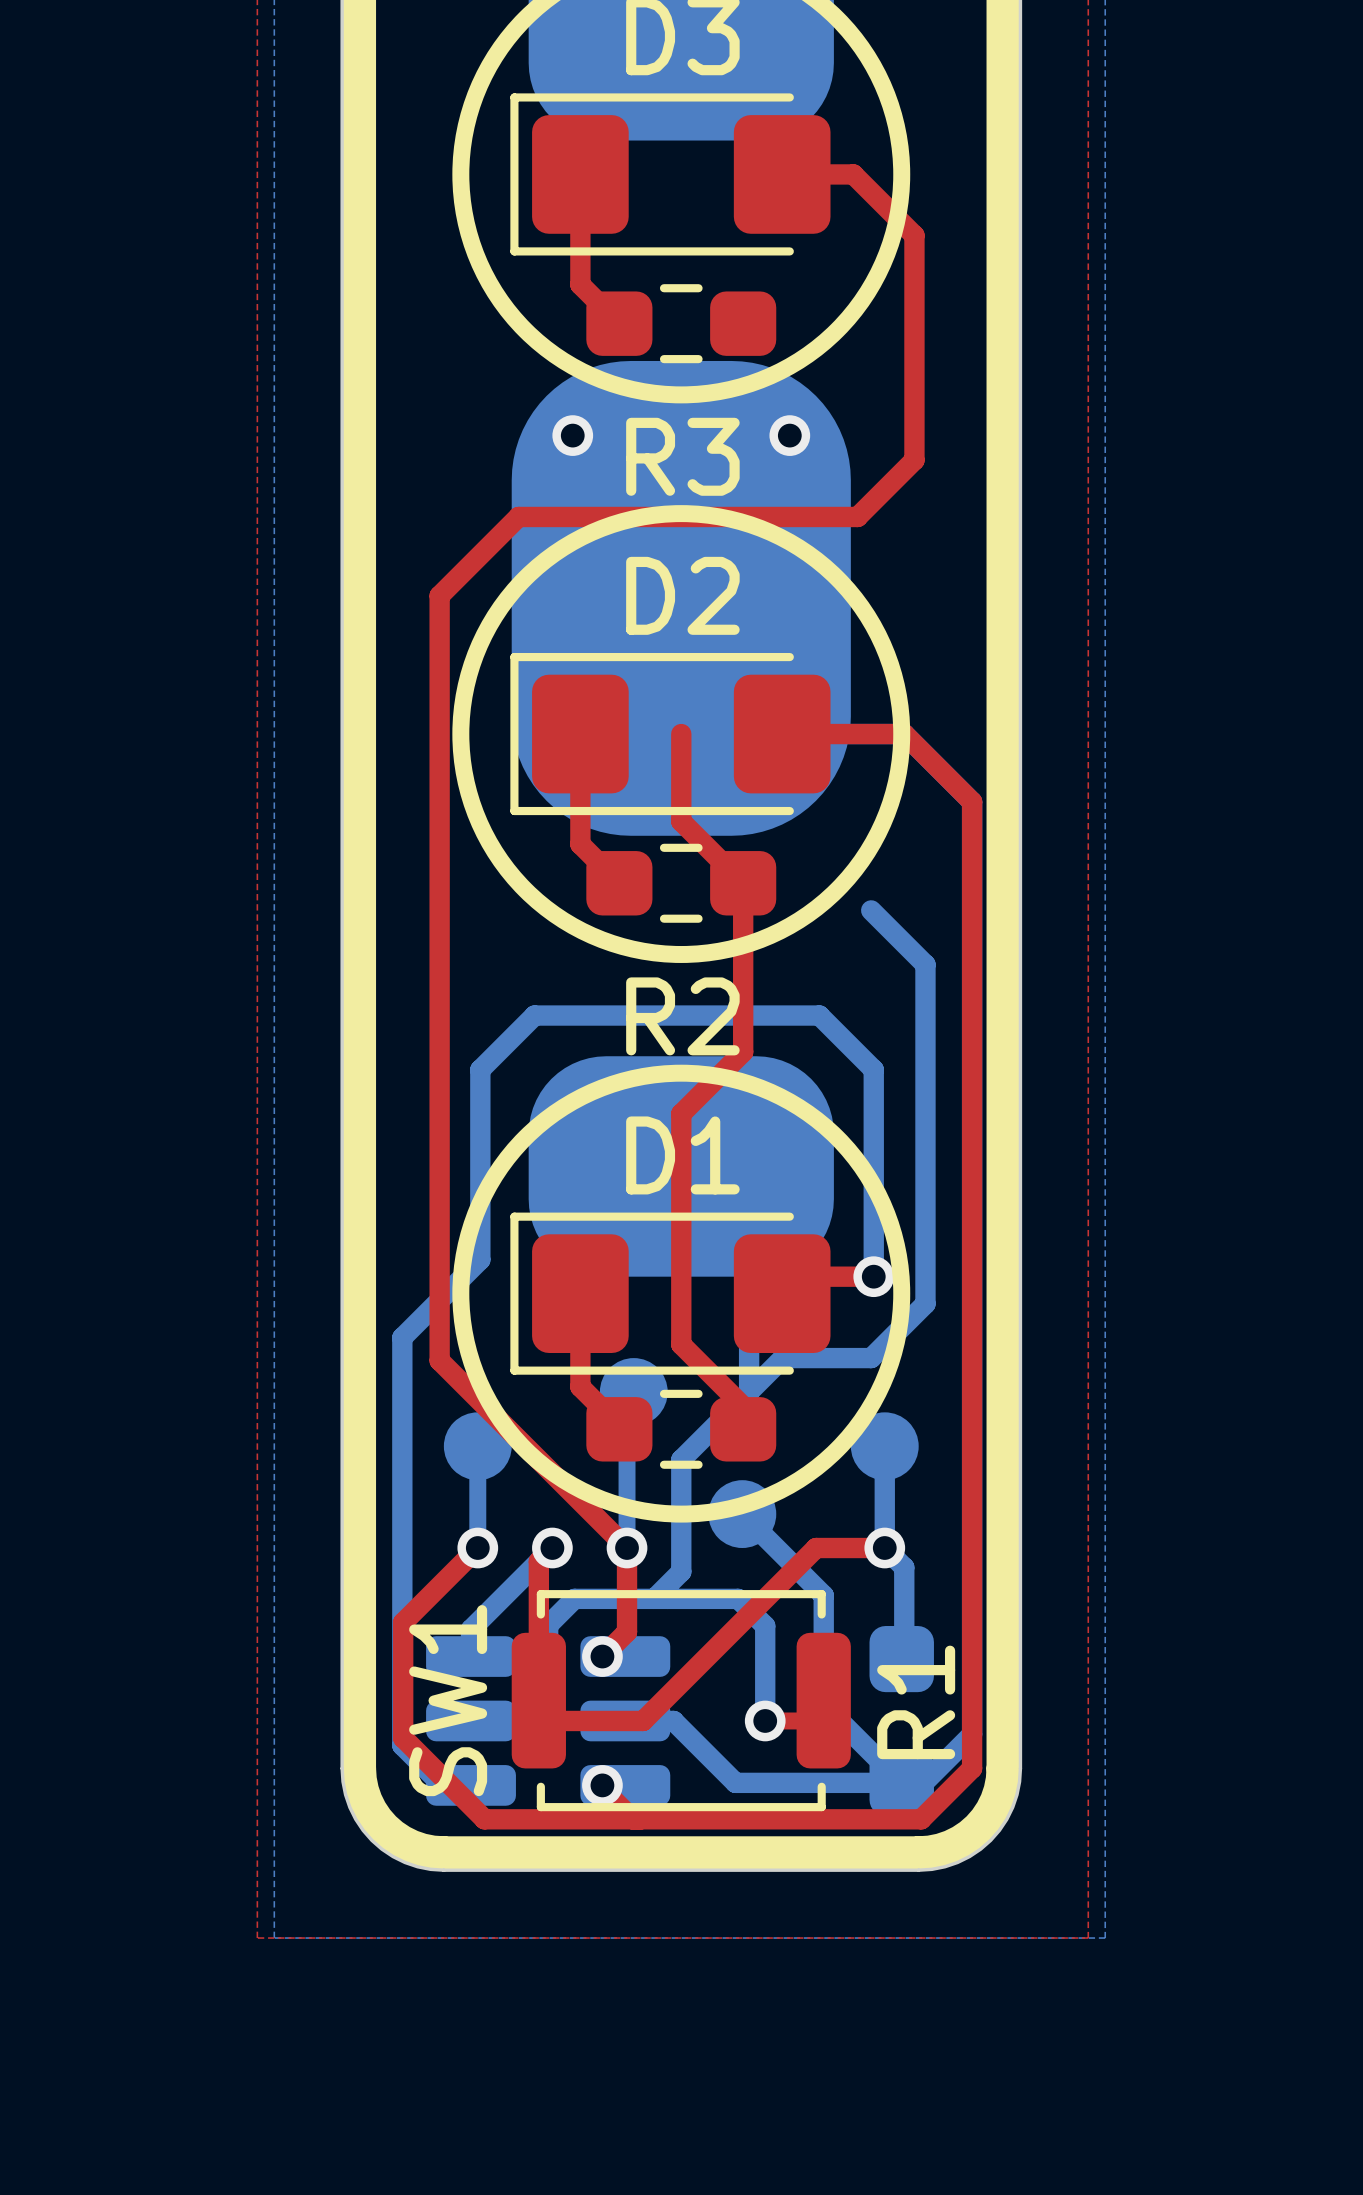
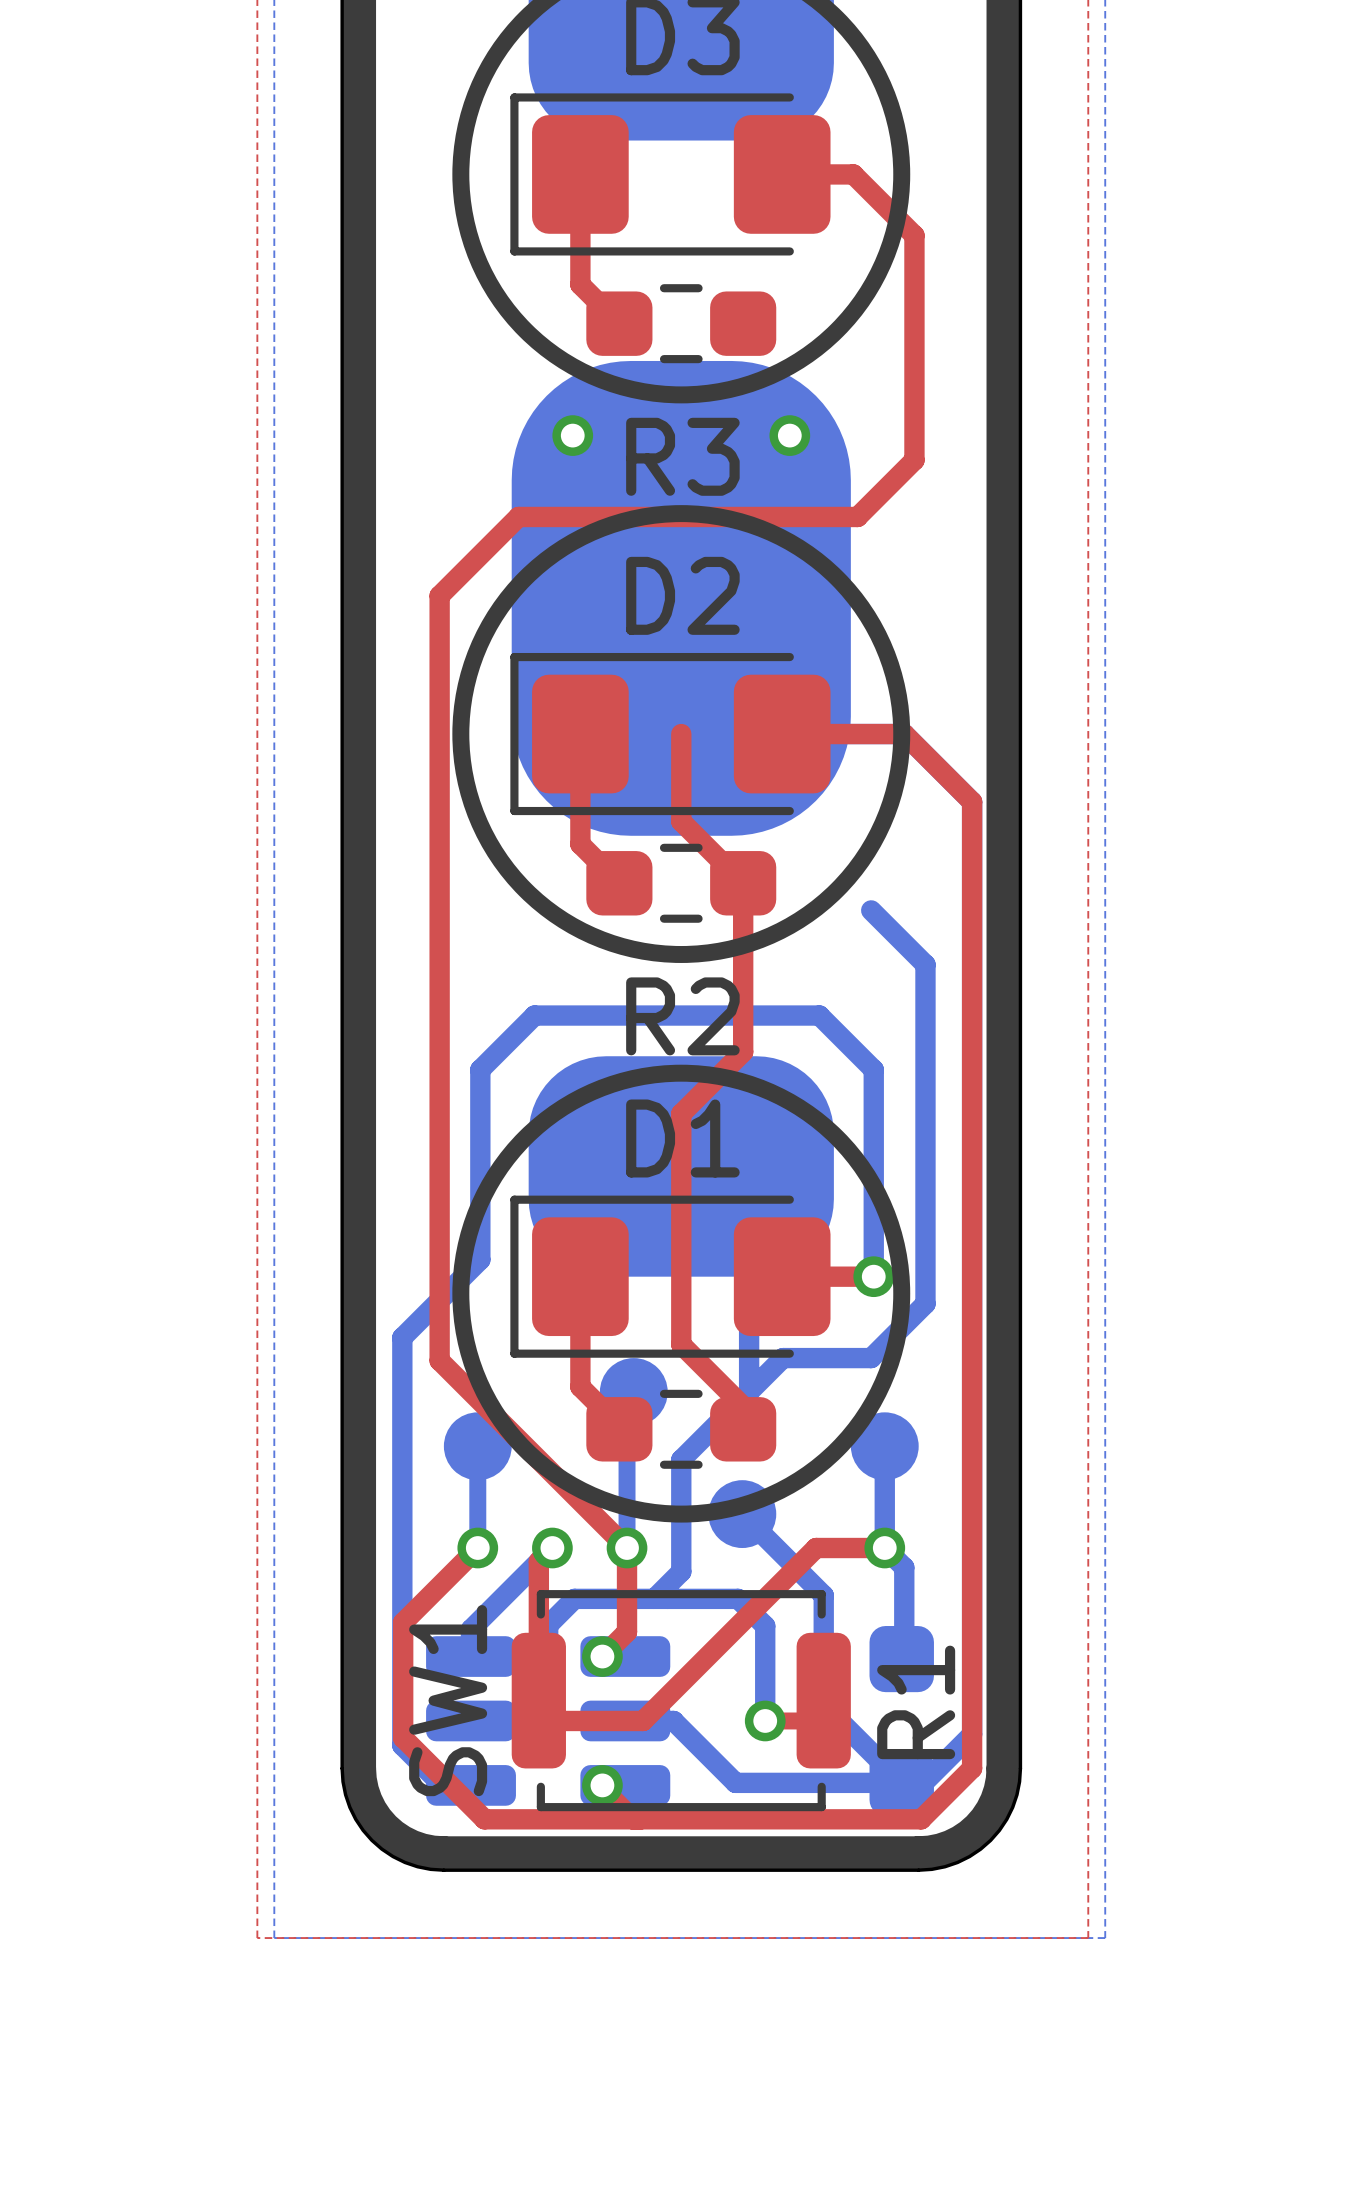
D1 position: (670, 1293) -> (670, 1276)

